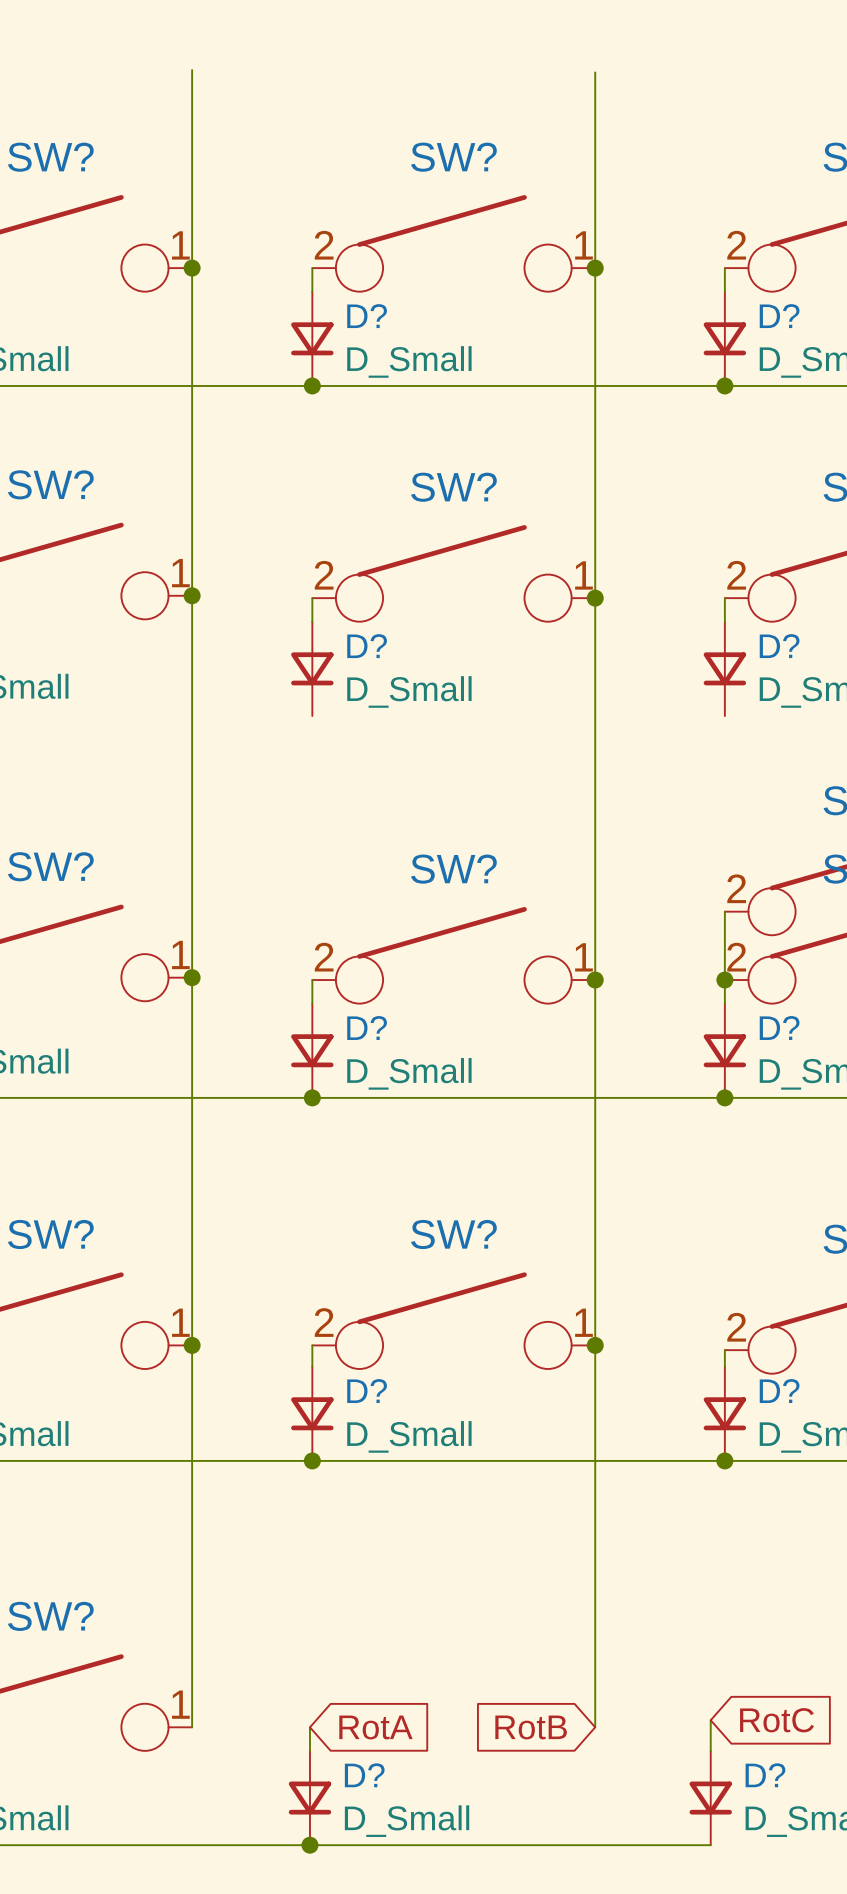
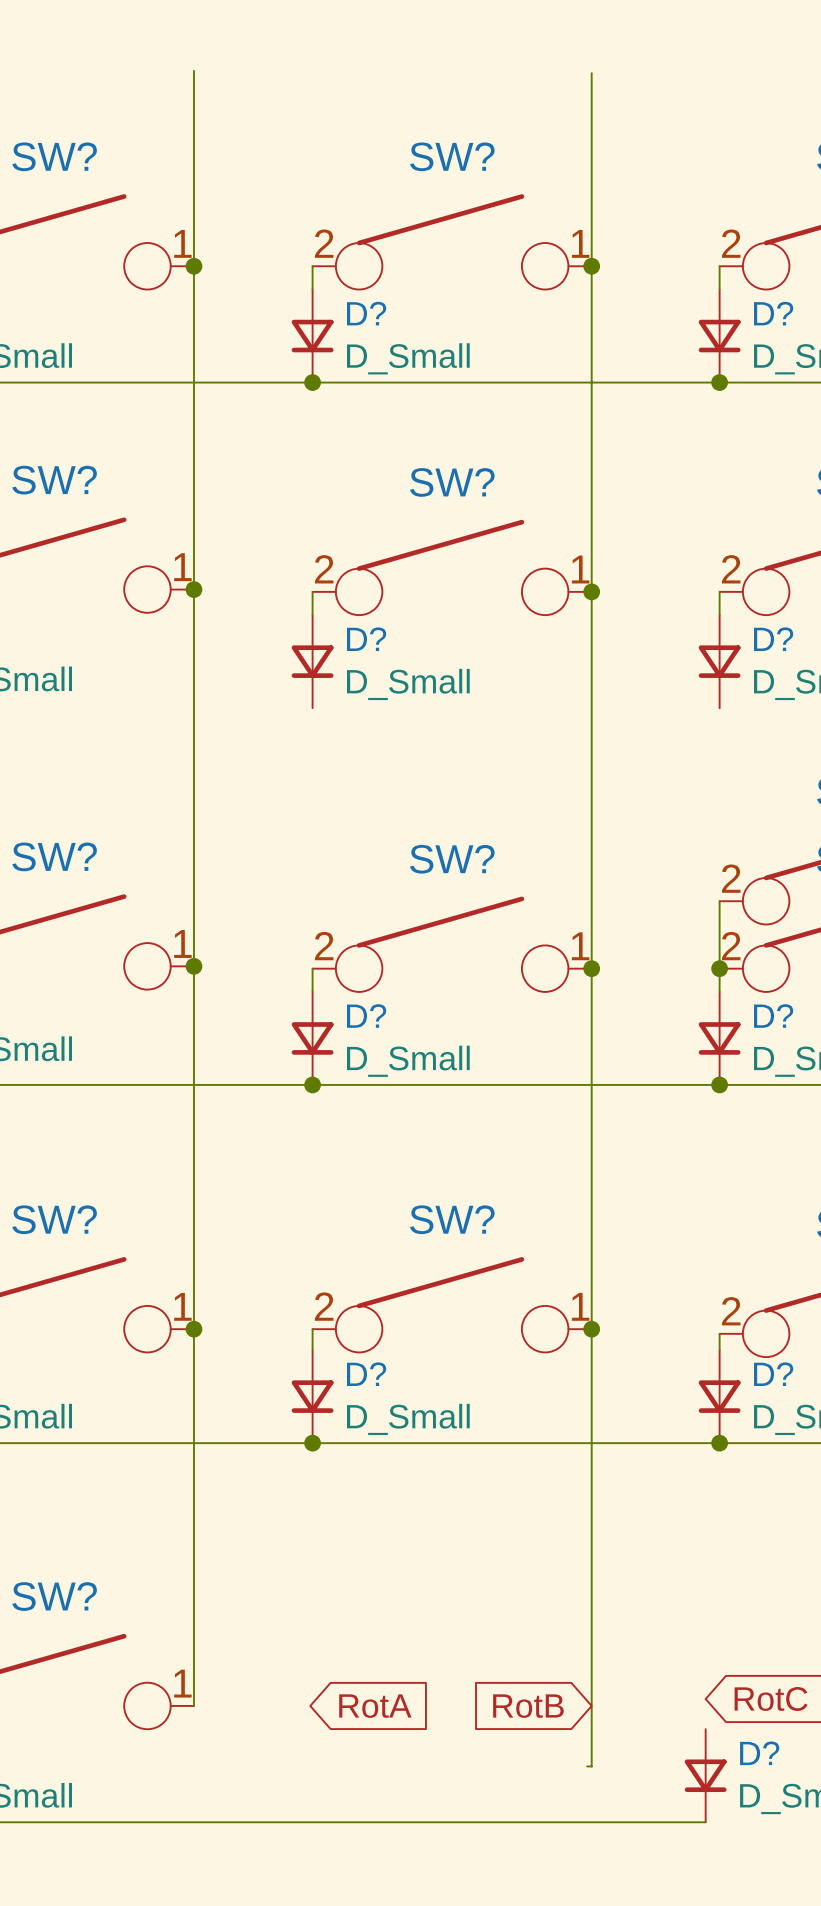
wire: (710, 1720) (710, 1750) -> none
wire: (309, 1727) (309, 1750) -> none
wire: none -> (591, 1705) (591, 1766) (587, 1766)
D?: D_Small (309, 1798) -> none
junction: (309, 1845) -> none

